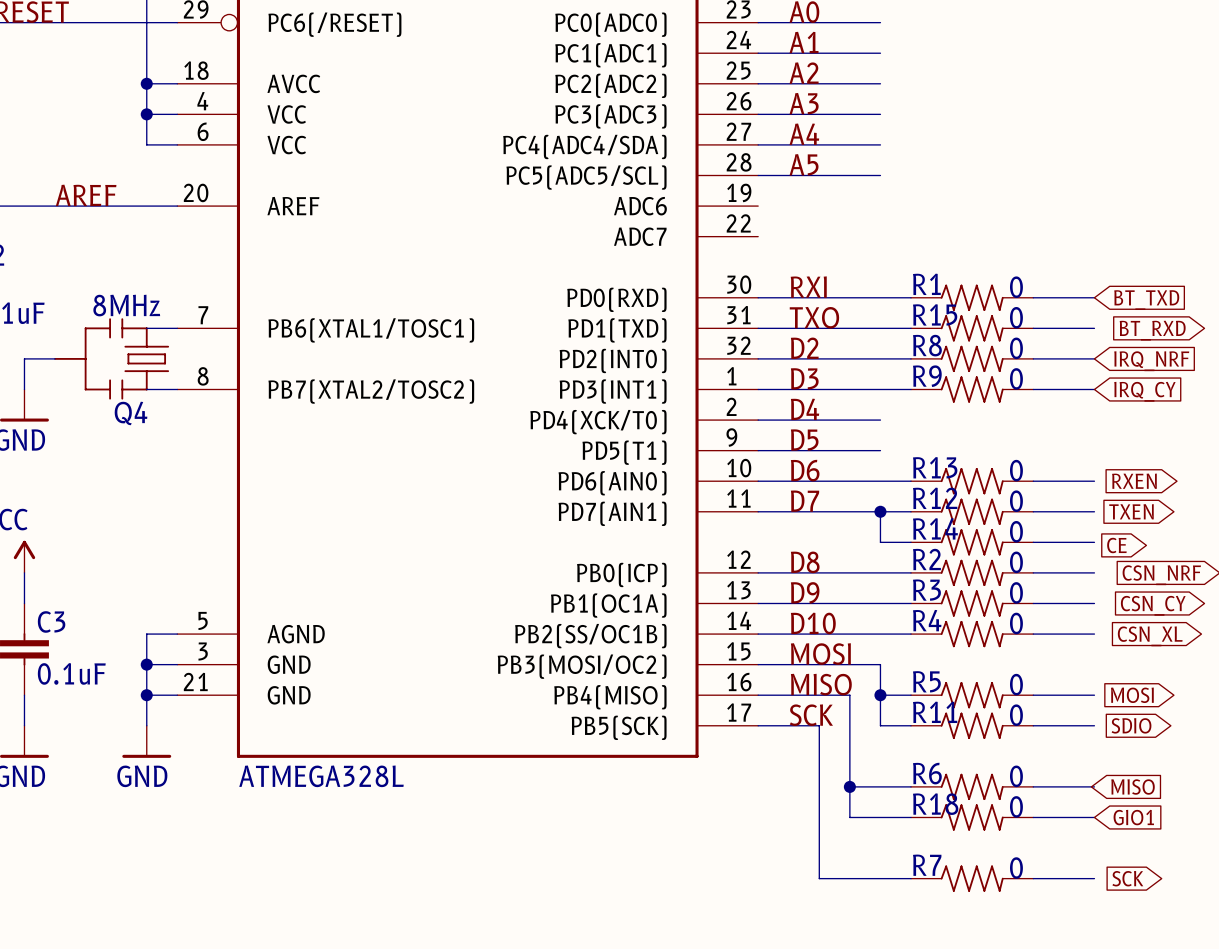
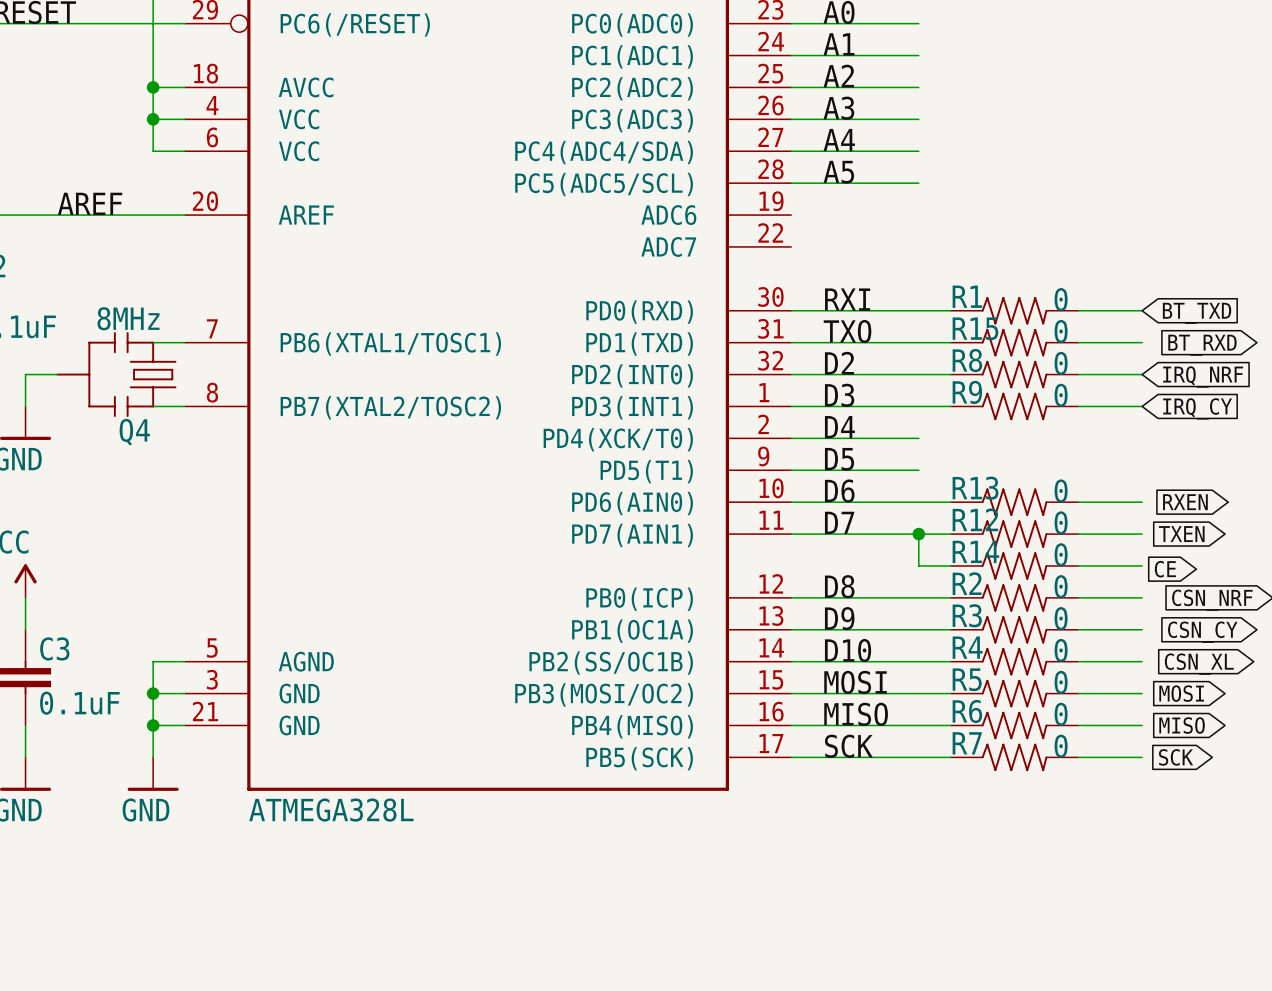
wire: (880, 664) (880, 725) -> (918, 693) (950, 693)
R5: none -> 0 (1014, 693)
global label: none -> MOSI (1181, 693)
R5 name: R5 (926, 681) -> R6 (967, 711)
wire: (849, 695) (849, 817) (911, 817) -> (886, 725) (918, 725)
junction: (880, 695) -> none
global label: MOSI (1132, 695) -> MISO (1182, 725)
R11 name: R11 (935, 712) -> R7 (967, 743)
wire: (819, 725) (819, 878) (911, 878) -> (855, 757) (918, 757)
global label: SDIO (1131, 725) -> none
wire: (849, 786) (911, 786) -> none
junction: (849, 786) -> none
R6: 0 (972, 786) -> none
wire: (1033, 786) (1094, 786) -> (1078, 693) (1142, 693)
global label: MISO (1133, 787) -> none
R18: 0 (972, 817) -> none
wire: (1033, 817) (1094, 817) -> none
global label: GIO1 (1133, 817) -> none
R7: 0 (972, 878) -> none
wire: (1033, 878) (1094, 878) -> none
global label position: SCK (1127, 878) -> SCK (1176, 757)

